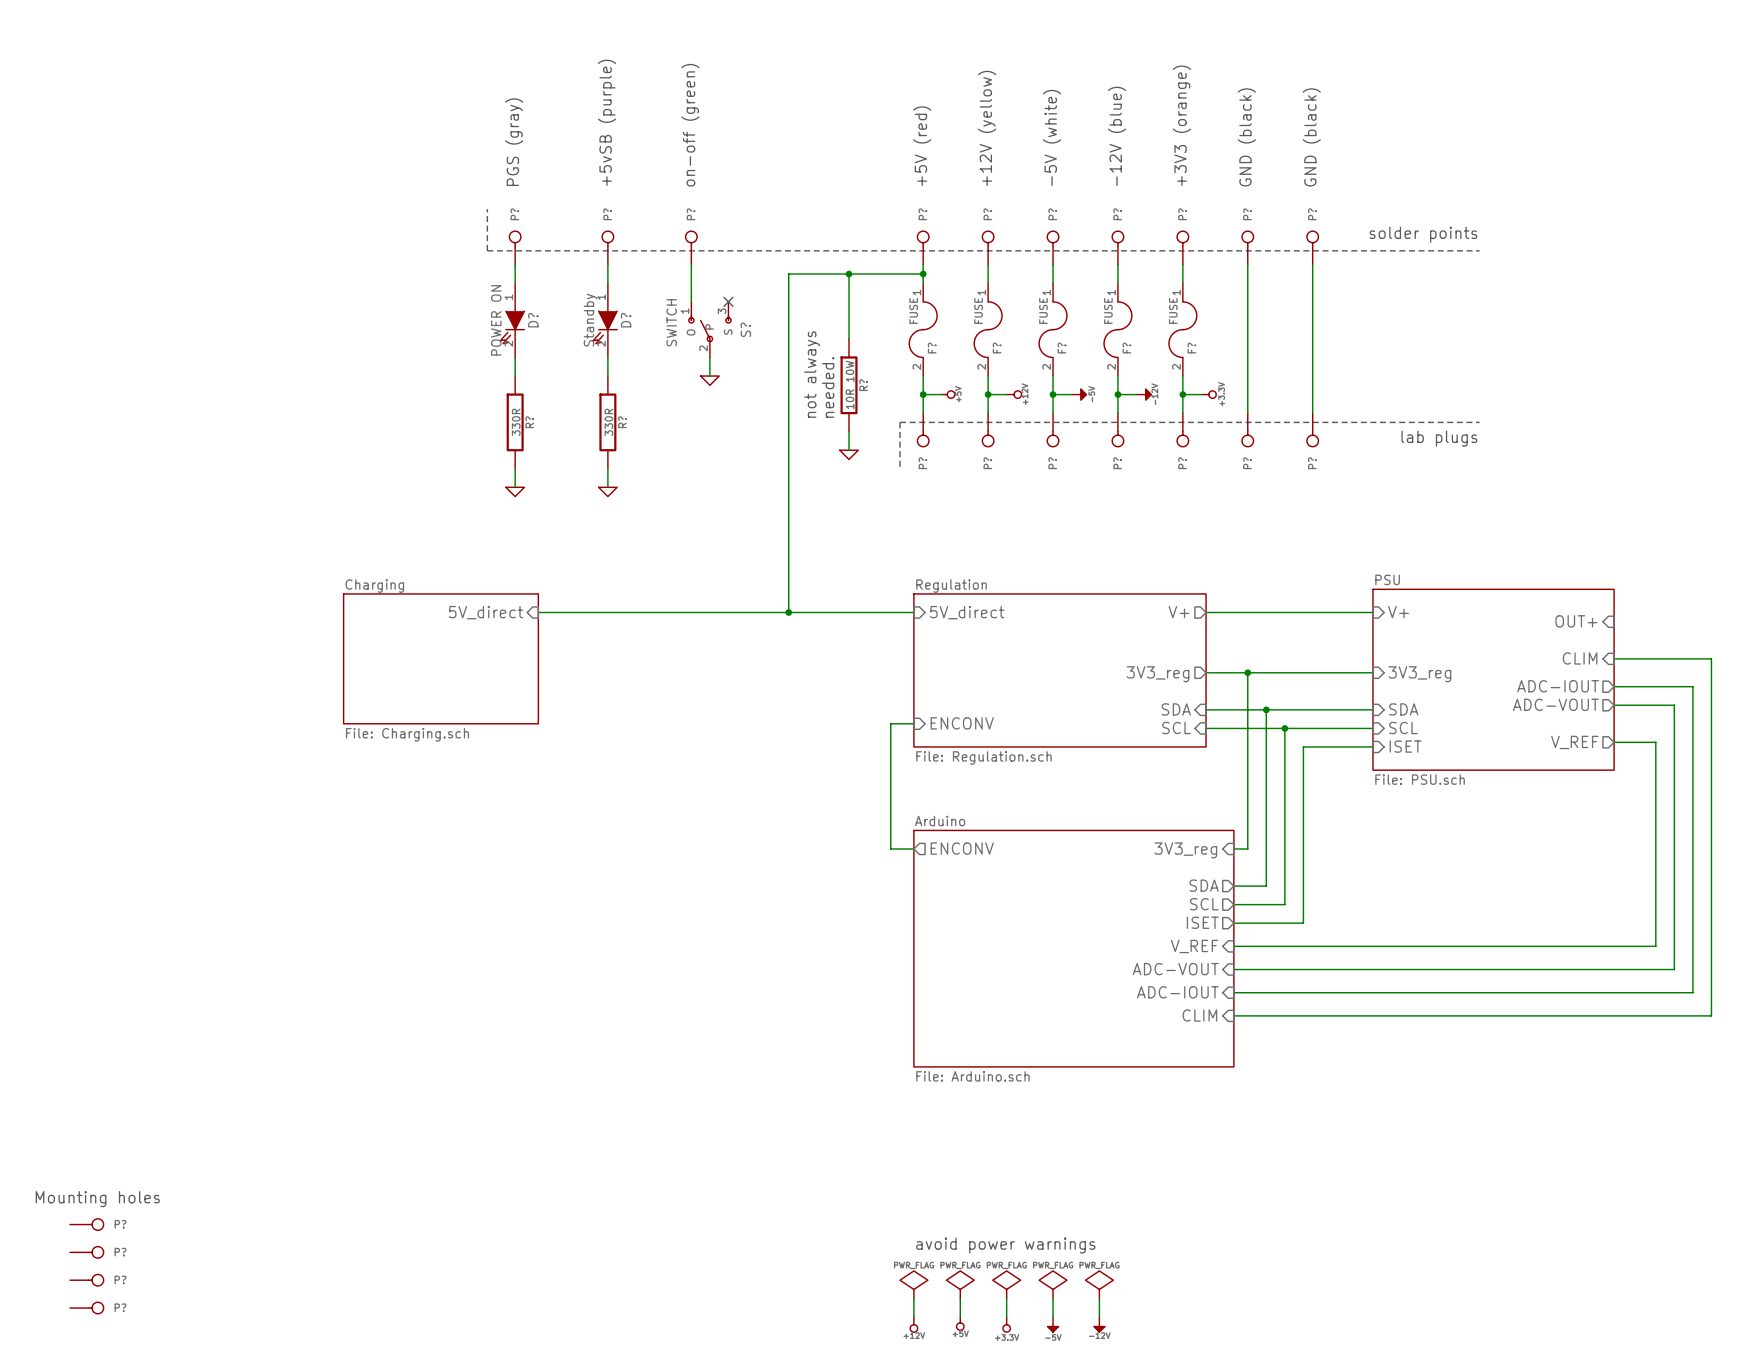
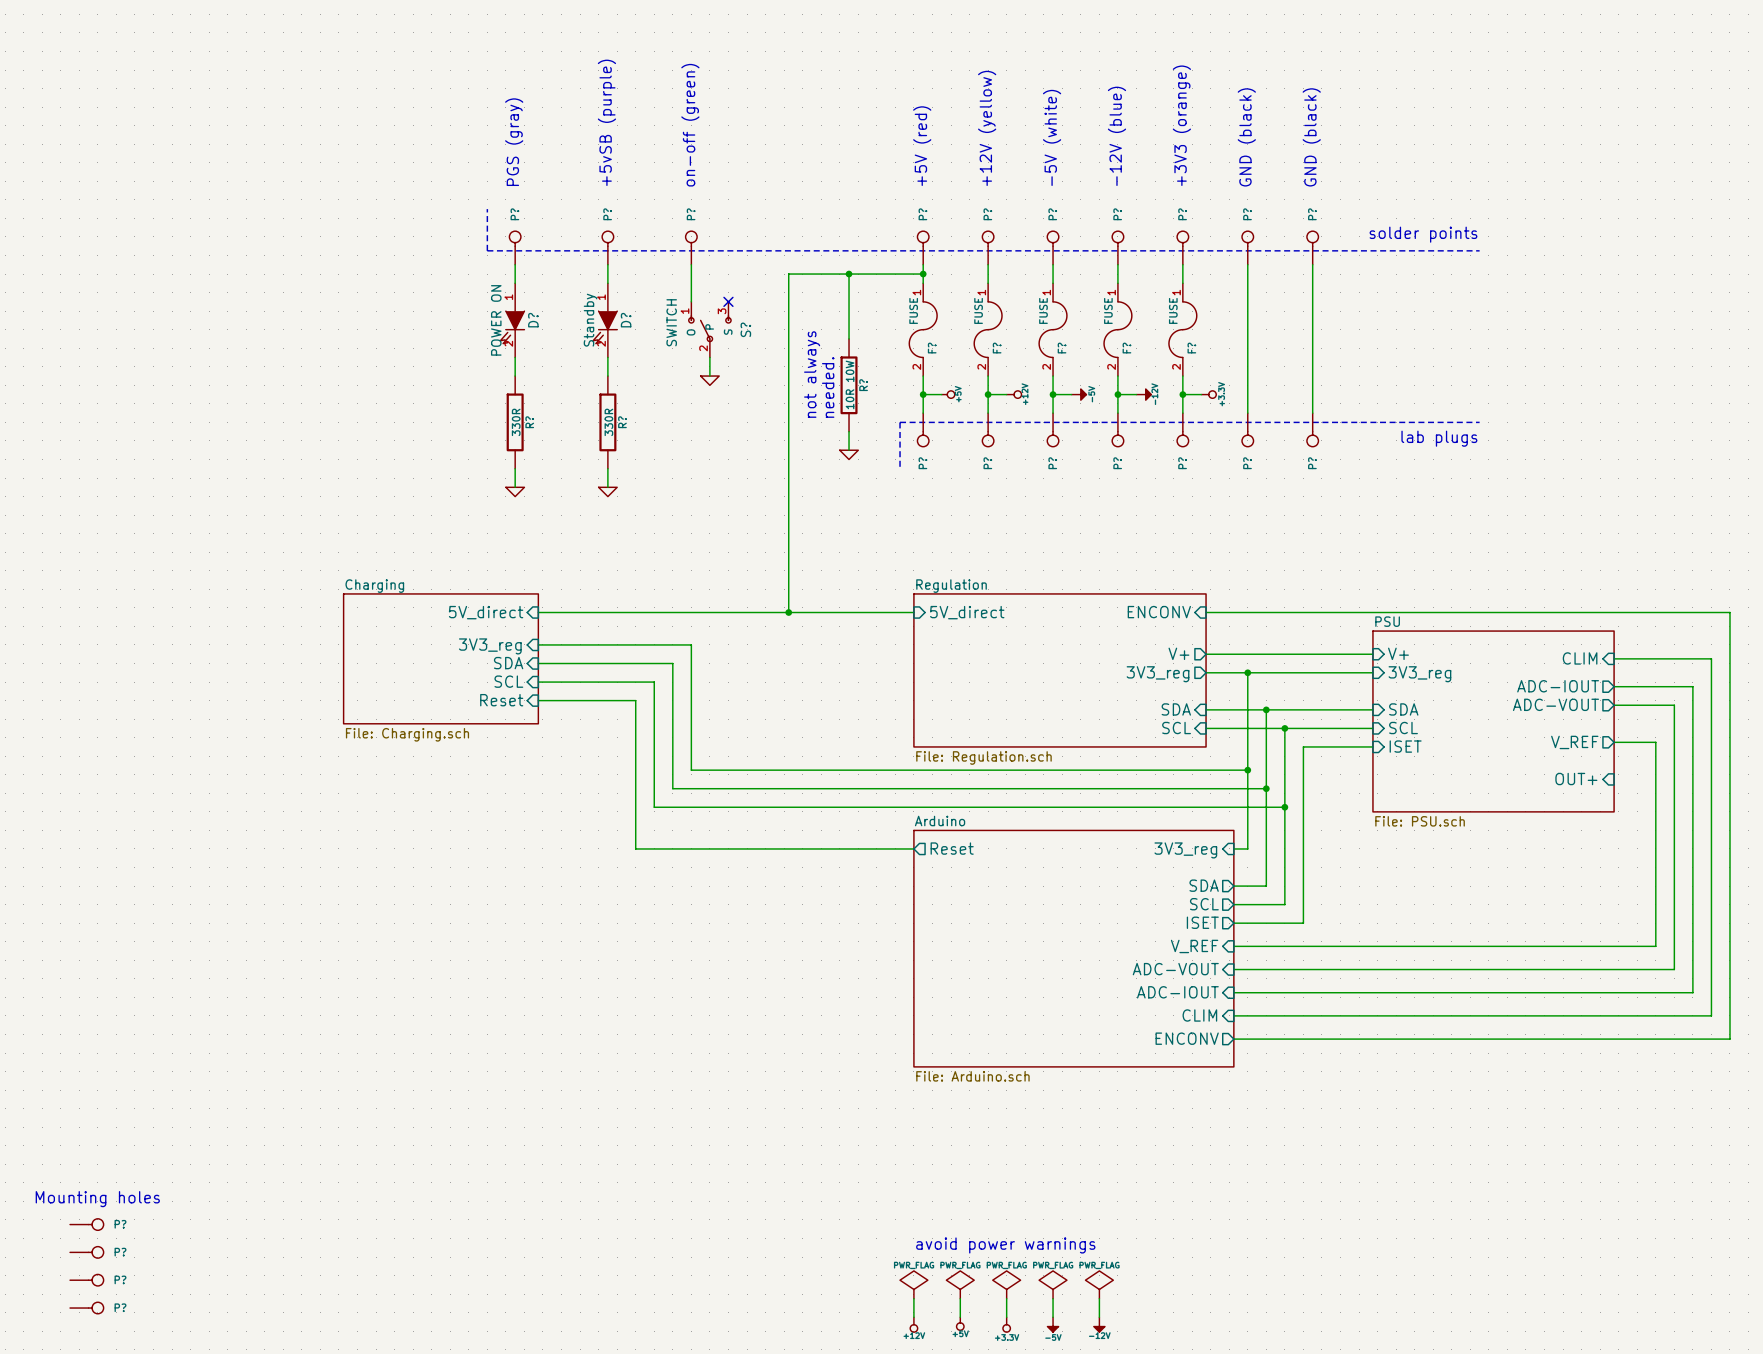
sheet pin shape: output (1178, 612) -> input (1159, 612)
sheet pin: V+ (1178, 612) -> ENCONV (1159, 612)
wire: none -> (1372, 612) (1729, 612) (1729, 1039) (1233, 1039)
sheet pin position: V+ (1398, 612) -> V+ (1398, 653)
sheet pin position: OUT+ (1576, 621) -> OUT+ (1576, 779)
wire: none -> (538, 644) (691, 644) (691, 770) (1247, 770)
sheet pin: none -> 3V3_reg (490, 646)
sheet pin: none -> V+ (1178, 653)
wire: none -> (1206, 654) (1372, 654)
sheet pin: none -> SDA (508, 663)
wire: none -> (538, 663) (672, 663) (672, 788) (1266, 788)
sheet PSU position: (1493, 679) -> (1493, 721)
sheet pin: none -> SCL (508, 681)
wire: none -> (538, 682) (654, 682) (654, 807) (1284, 807)
sheet pin: none -> Reset (501, 700)
wire: (913, 723) (890, 723) (890, 848) -> (538, 700) (635, 700) (635, 848) (890, 848)
sheet pin: ENCONV (962, 723) -> none
junction: none -> (1247, 770)
junction: none -> (1266, 788)
junction: none -> (1284, 807)
sheet pin: ENCONV (962, 848) -> Reset (952, 848)
sheet pin: none -> ENCONV (1187, 1038)

